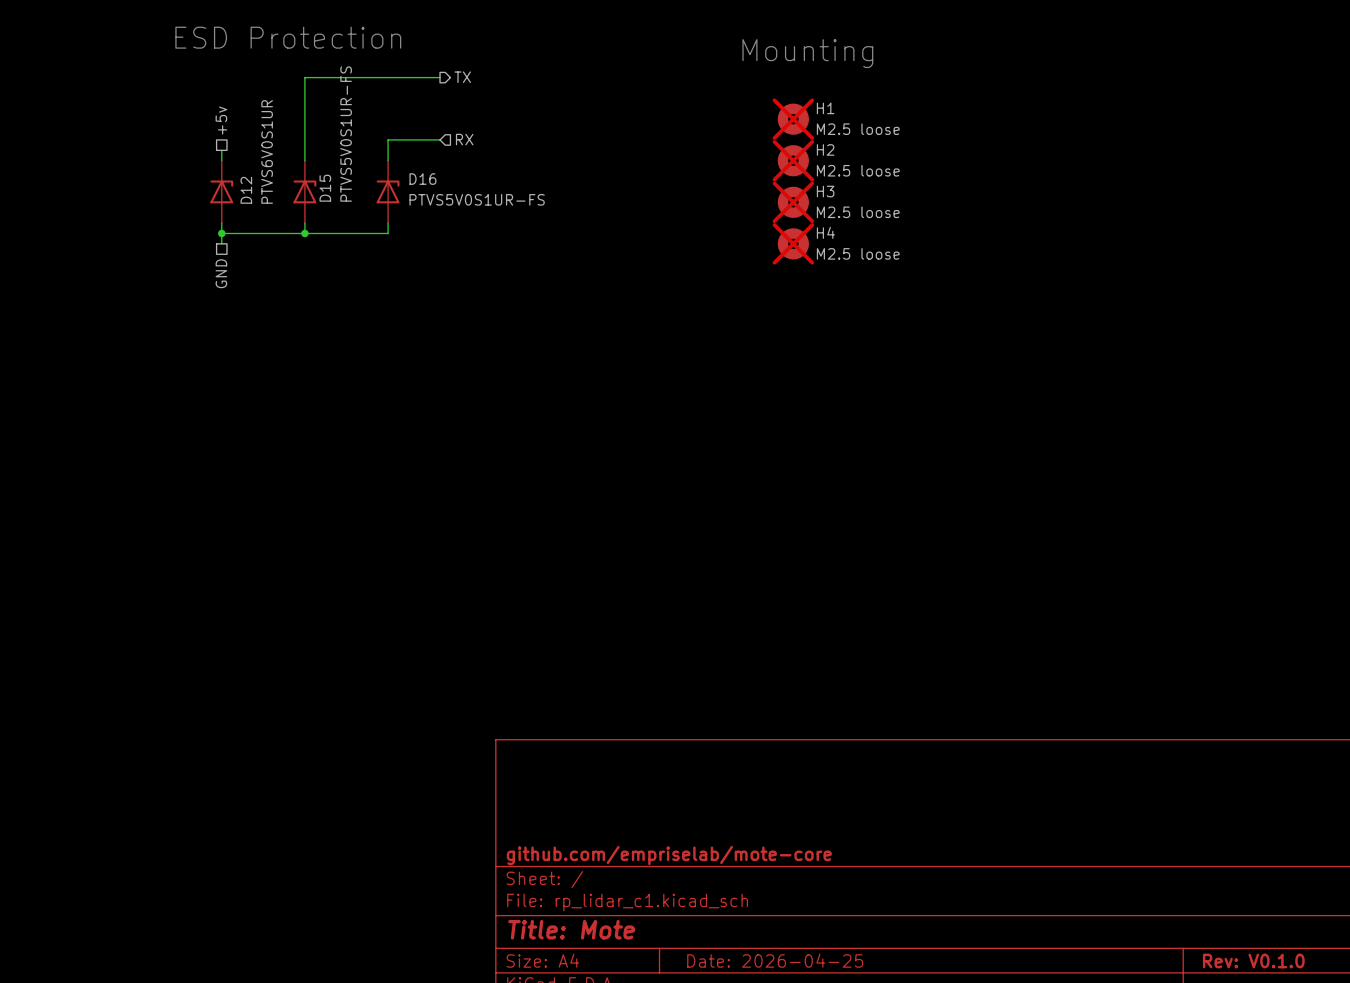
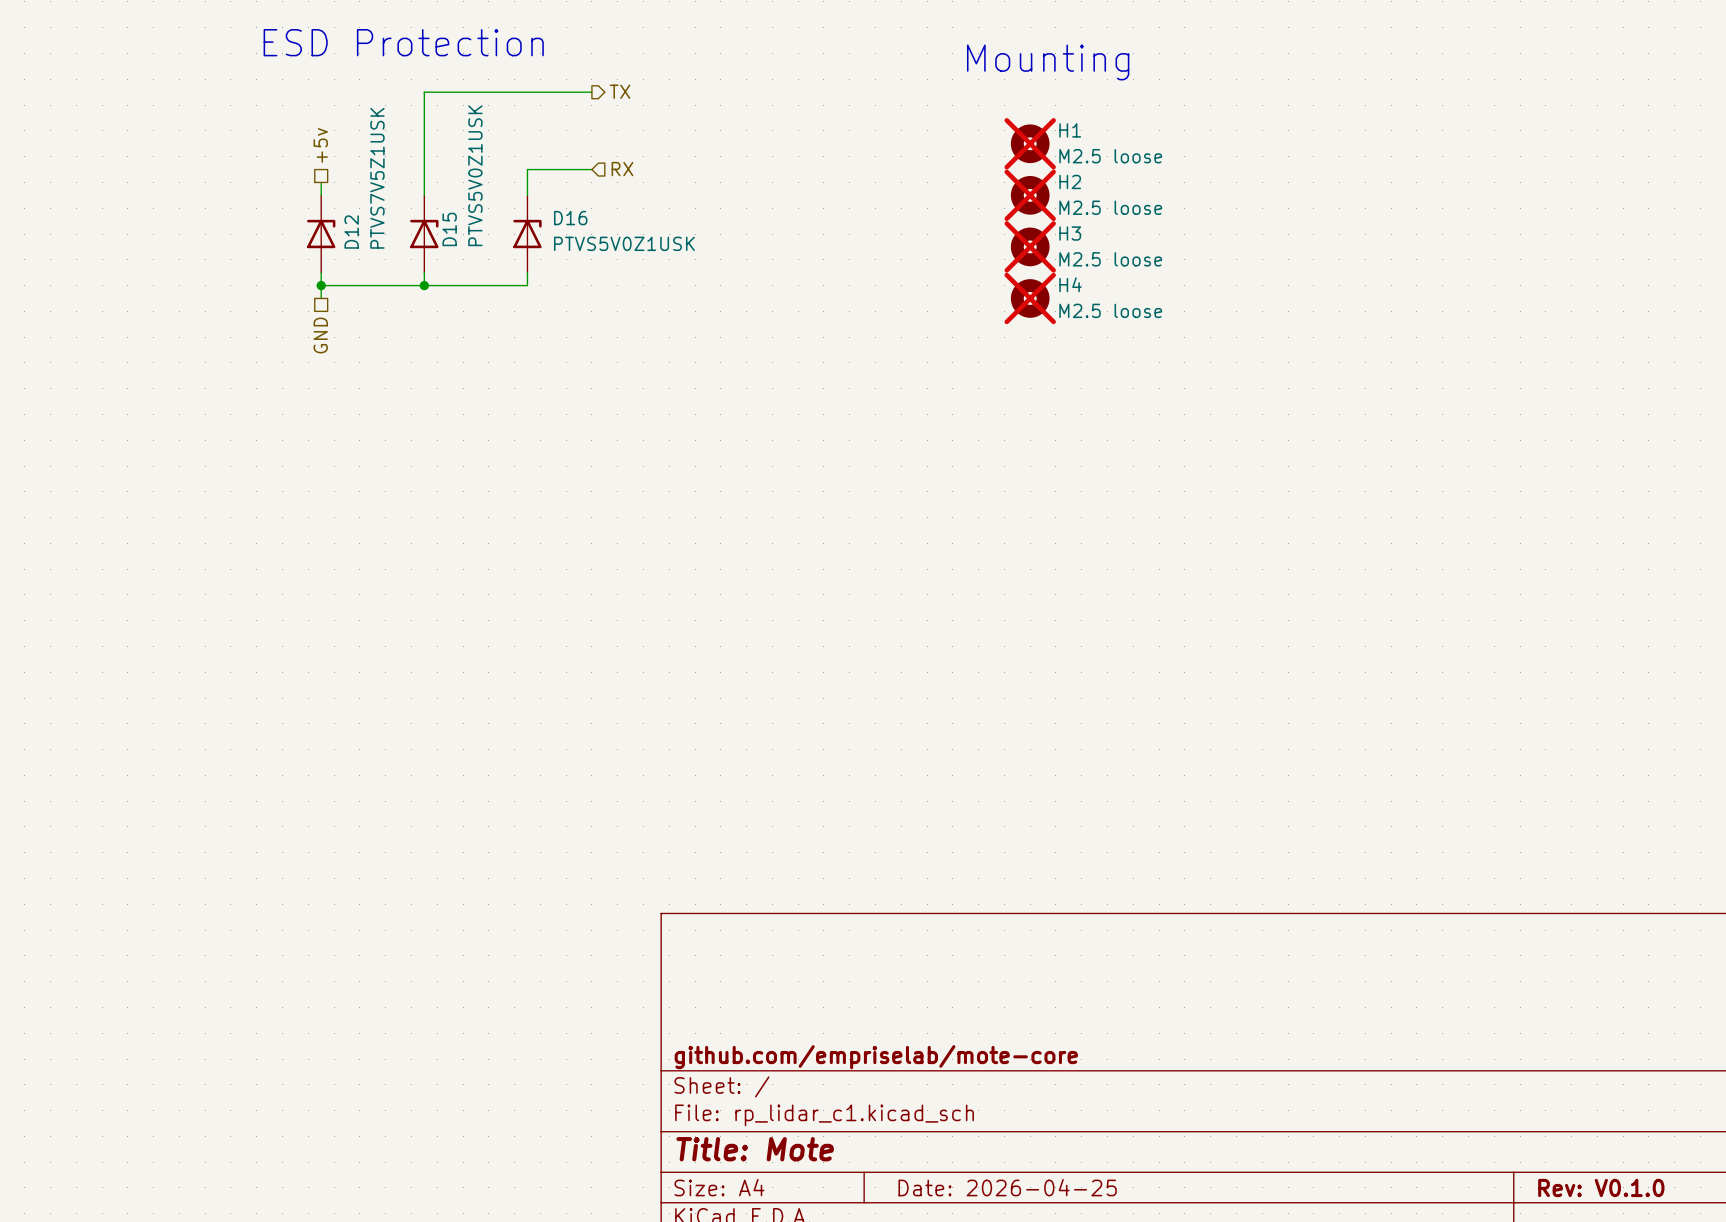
D15 value: PTVS5V0S1UR-FS (346, 134) -> PTVS5V0Z1USK (475, 175)
D12 value: PTVS6V0S1UR (267, 151) -> PTVS7V5Z1USK (377, 178)
D16 value: PTVS5V0S1UR-FS (477, 199) -> PTVS5V0Z1USK (624, 243)

